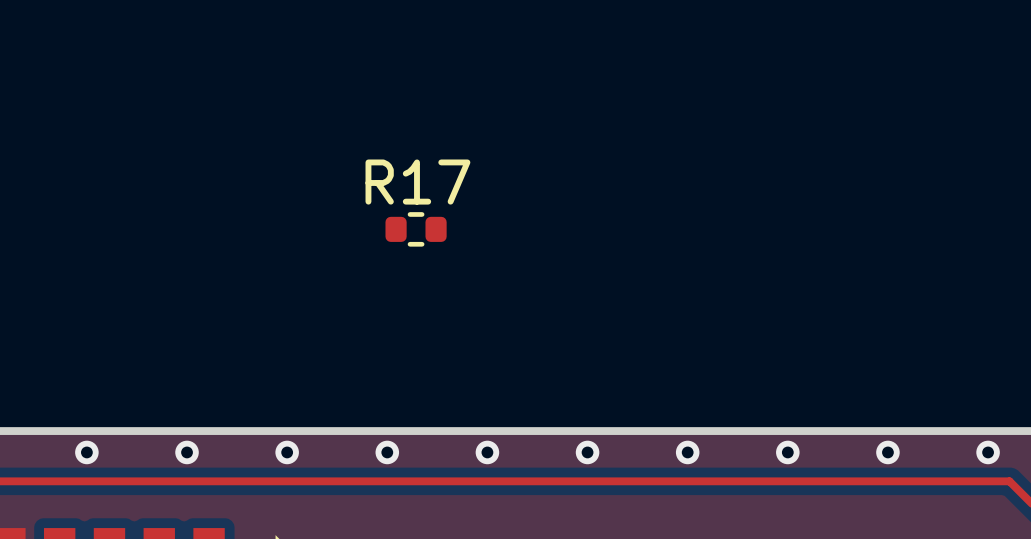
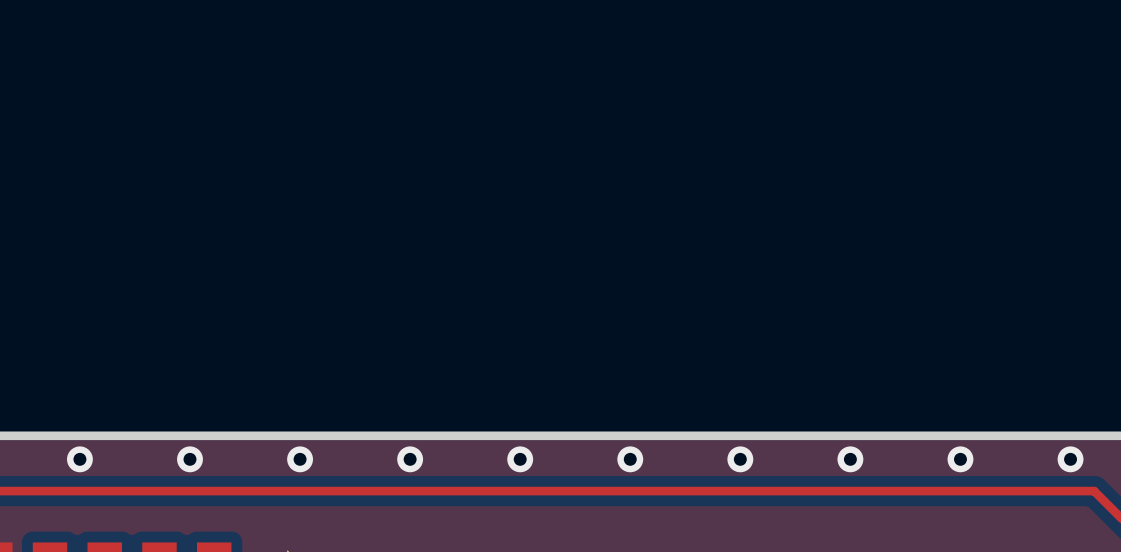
R17: (416, 229) -> none

